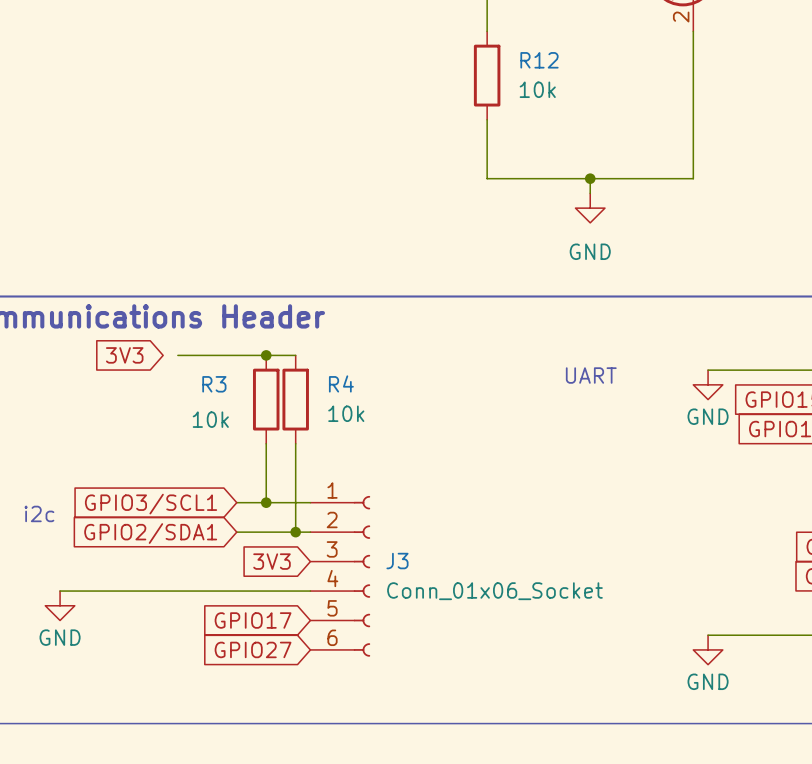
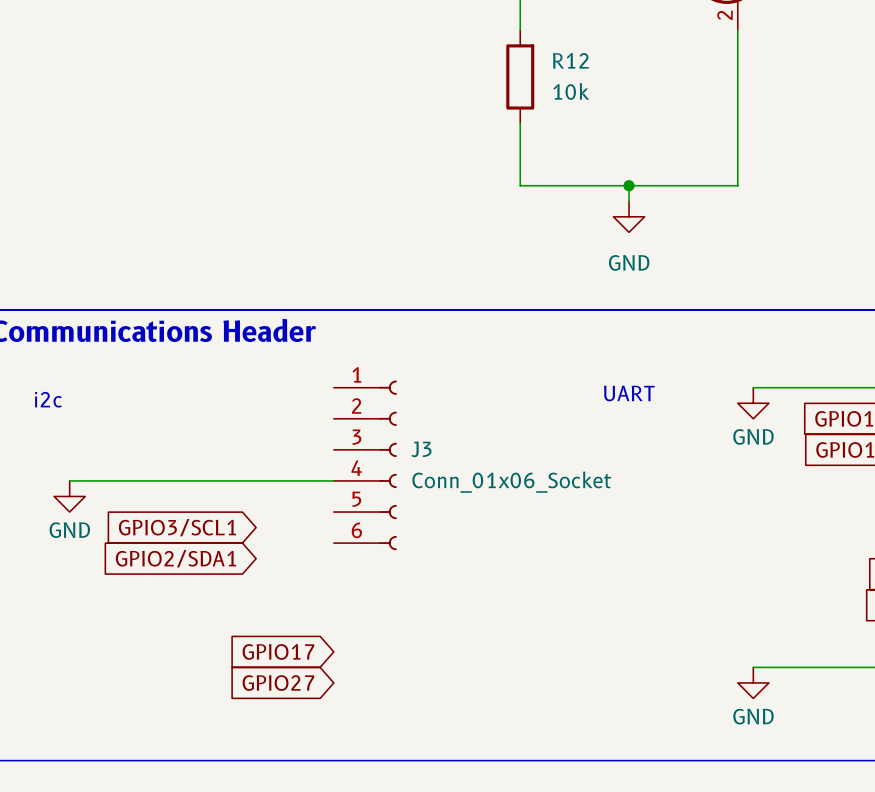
global label: 3V3 (124, 355) -> none
wire: (177, 355) (295, 355) -> none
junction: (266, 355) -> none
R3: 10k (266, 399) -> none
R4: 10k (295, 399) -> none
wire: (266, 443) (266, 502) -> none
wire: (295, 443) (295, 532) -> none
wire: (236, 502) (310, 502) -> none
junction: (266, 502) -> none
text position: i2c (39, 513) -> i2c (48, 399)
wire: (236, 532) (310, 532) -> none
junction: (295, 532) -> none
global label: 3V3 (271, 561) -> none
J3 position: (340, 576) -> (365, 465)
wire: (60, 591) (310, 591) -> (69, 480) (333, 480)
power symbol position: GND (60, 605) -> GND (69, 496)

